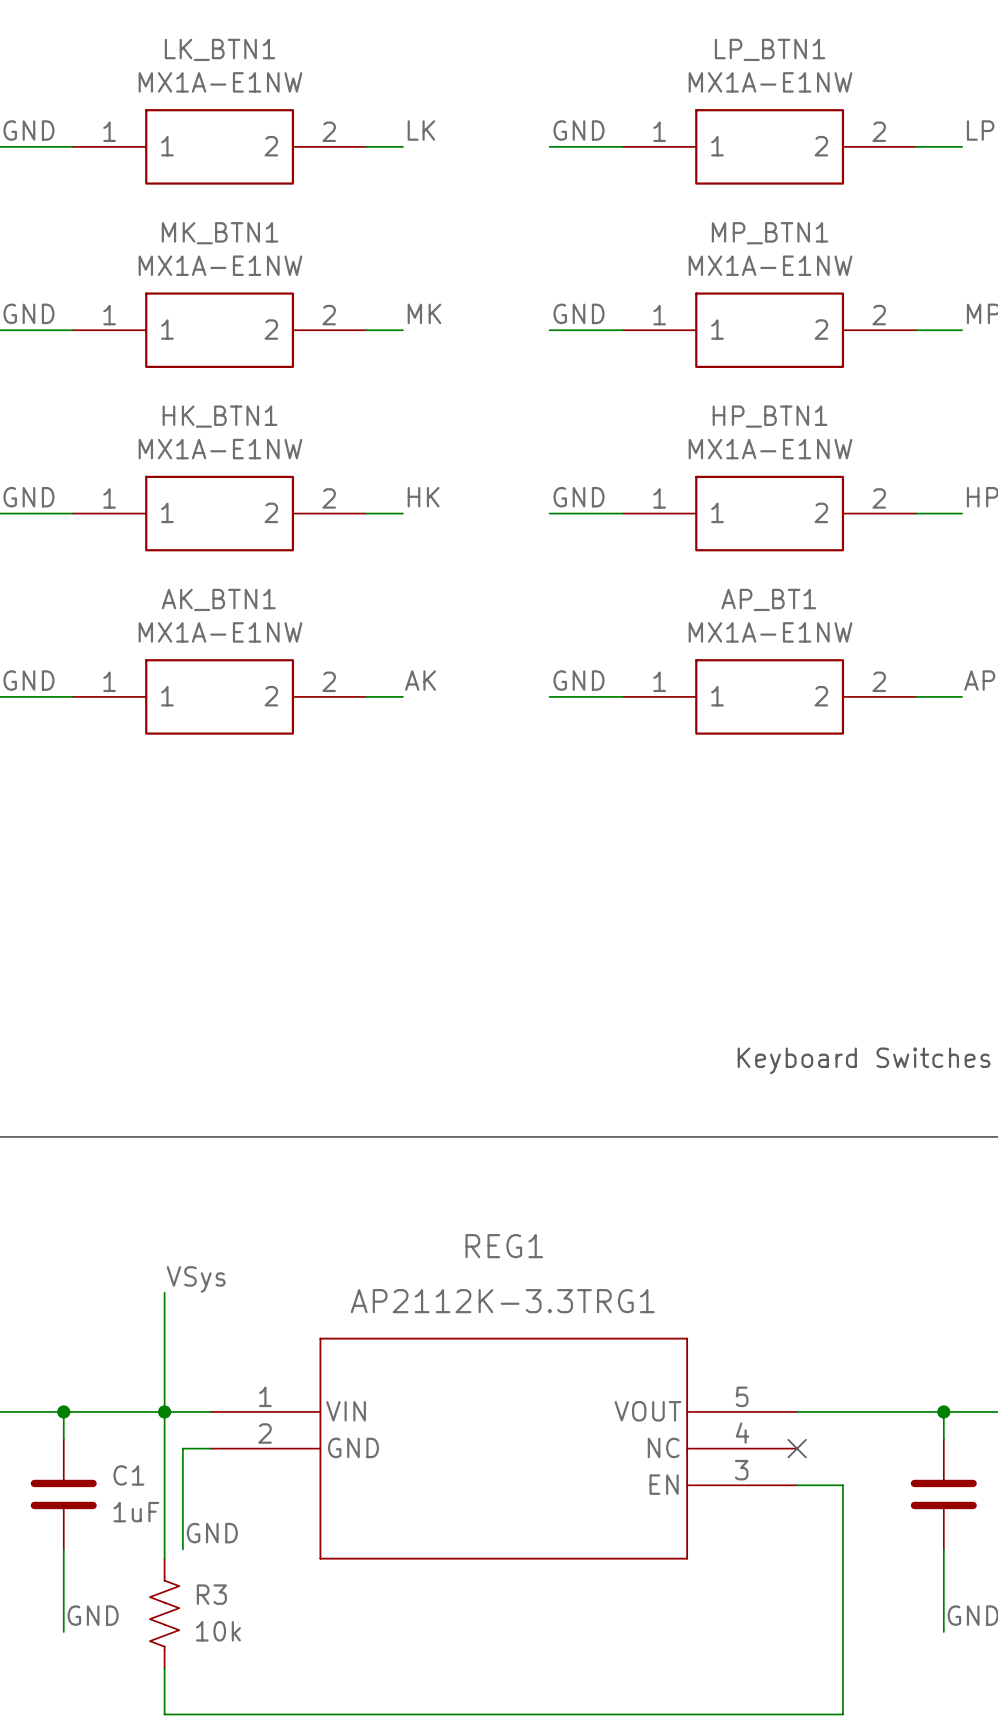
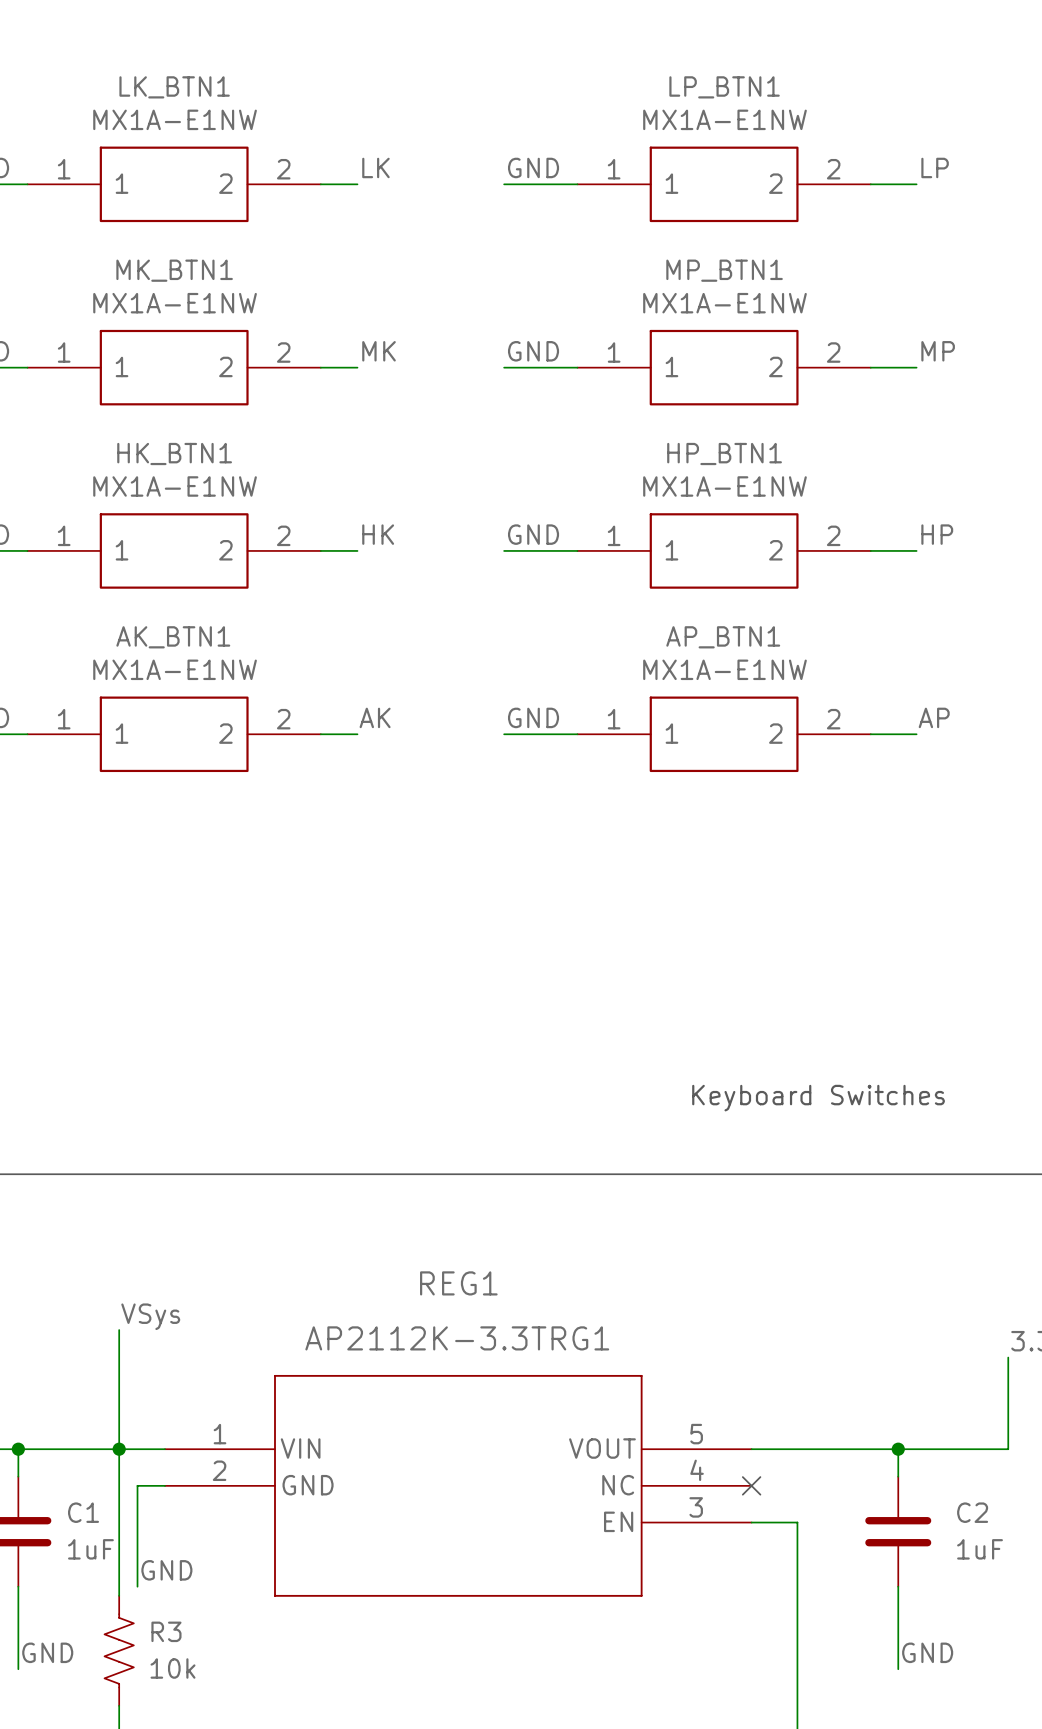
AP_BT1 name: AP_BT1 (768, 599) -> AP_BTN1 (723, 637)

